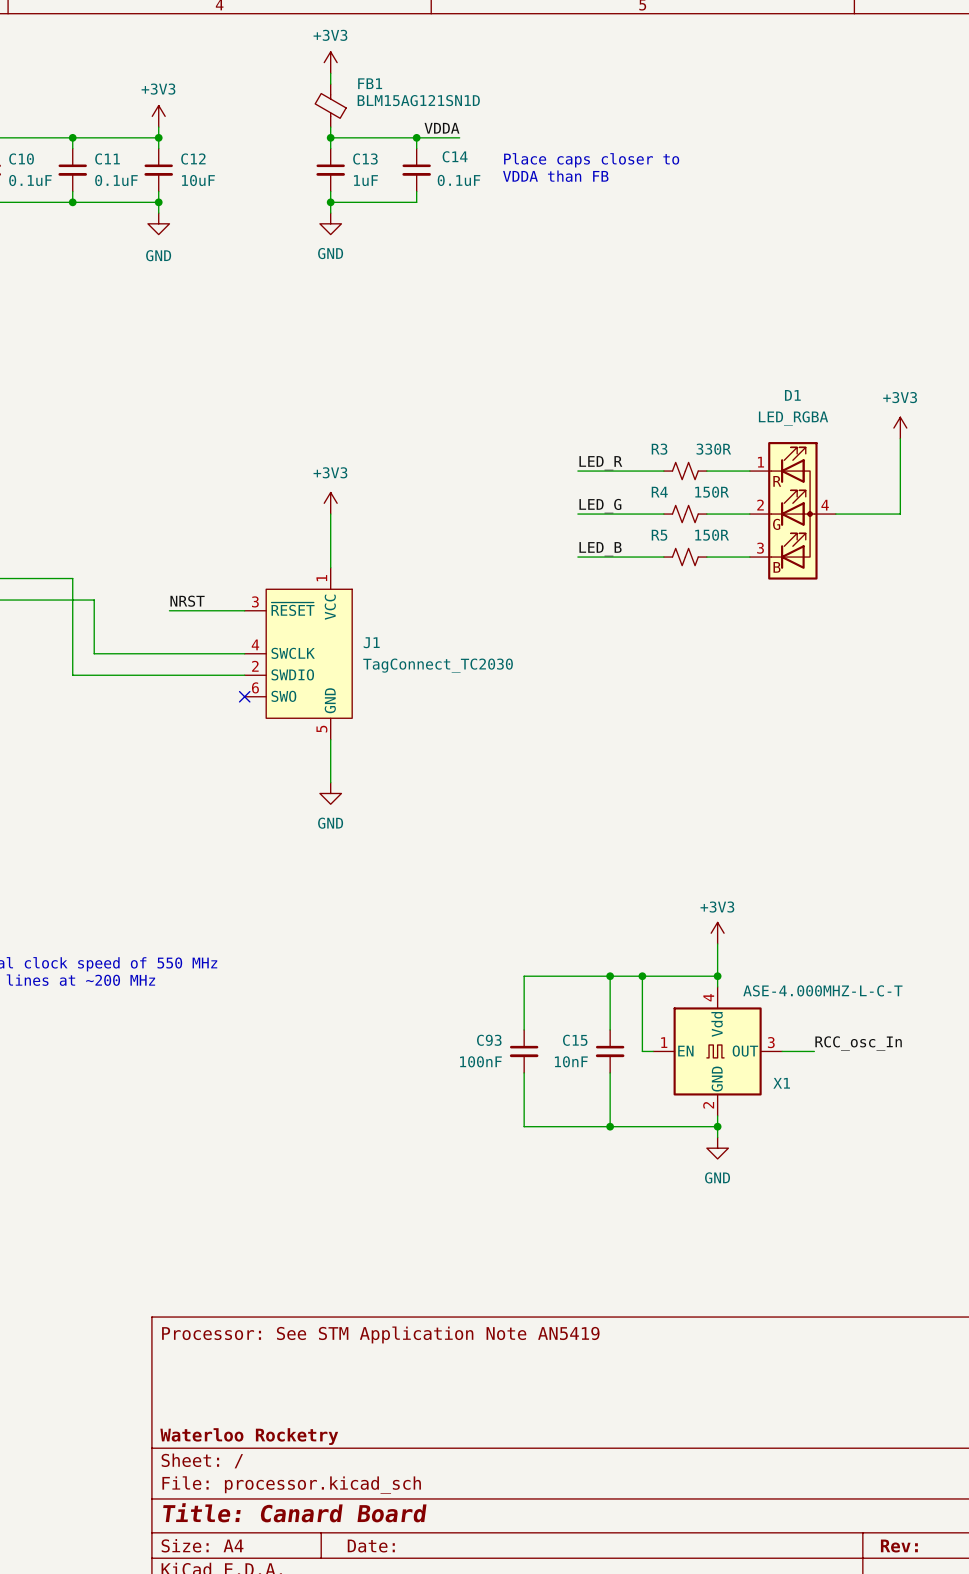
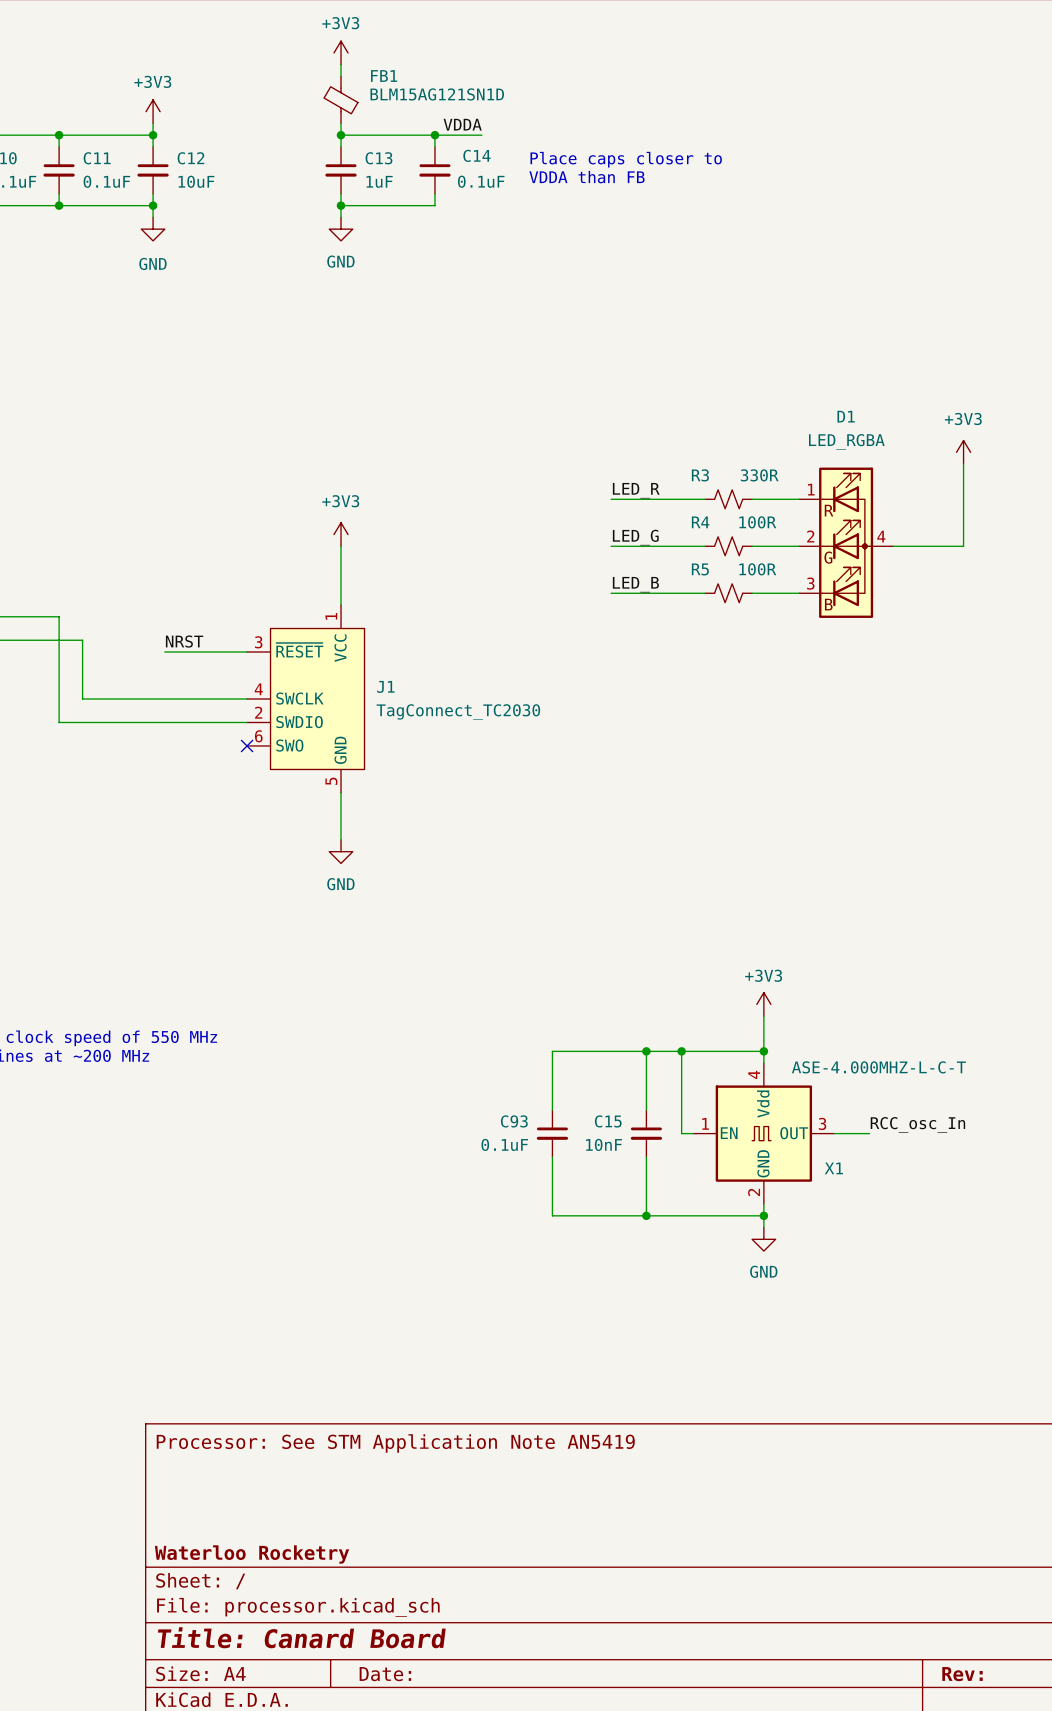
R4 value: 150R (712, 492) -> 100R (757, 522)
R5 value: 150R (712, 535) -> 100R (757, 569)
C93 value: 100nF (480, 1061) -> 0.1uF (504, 1144)

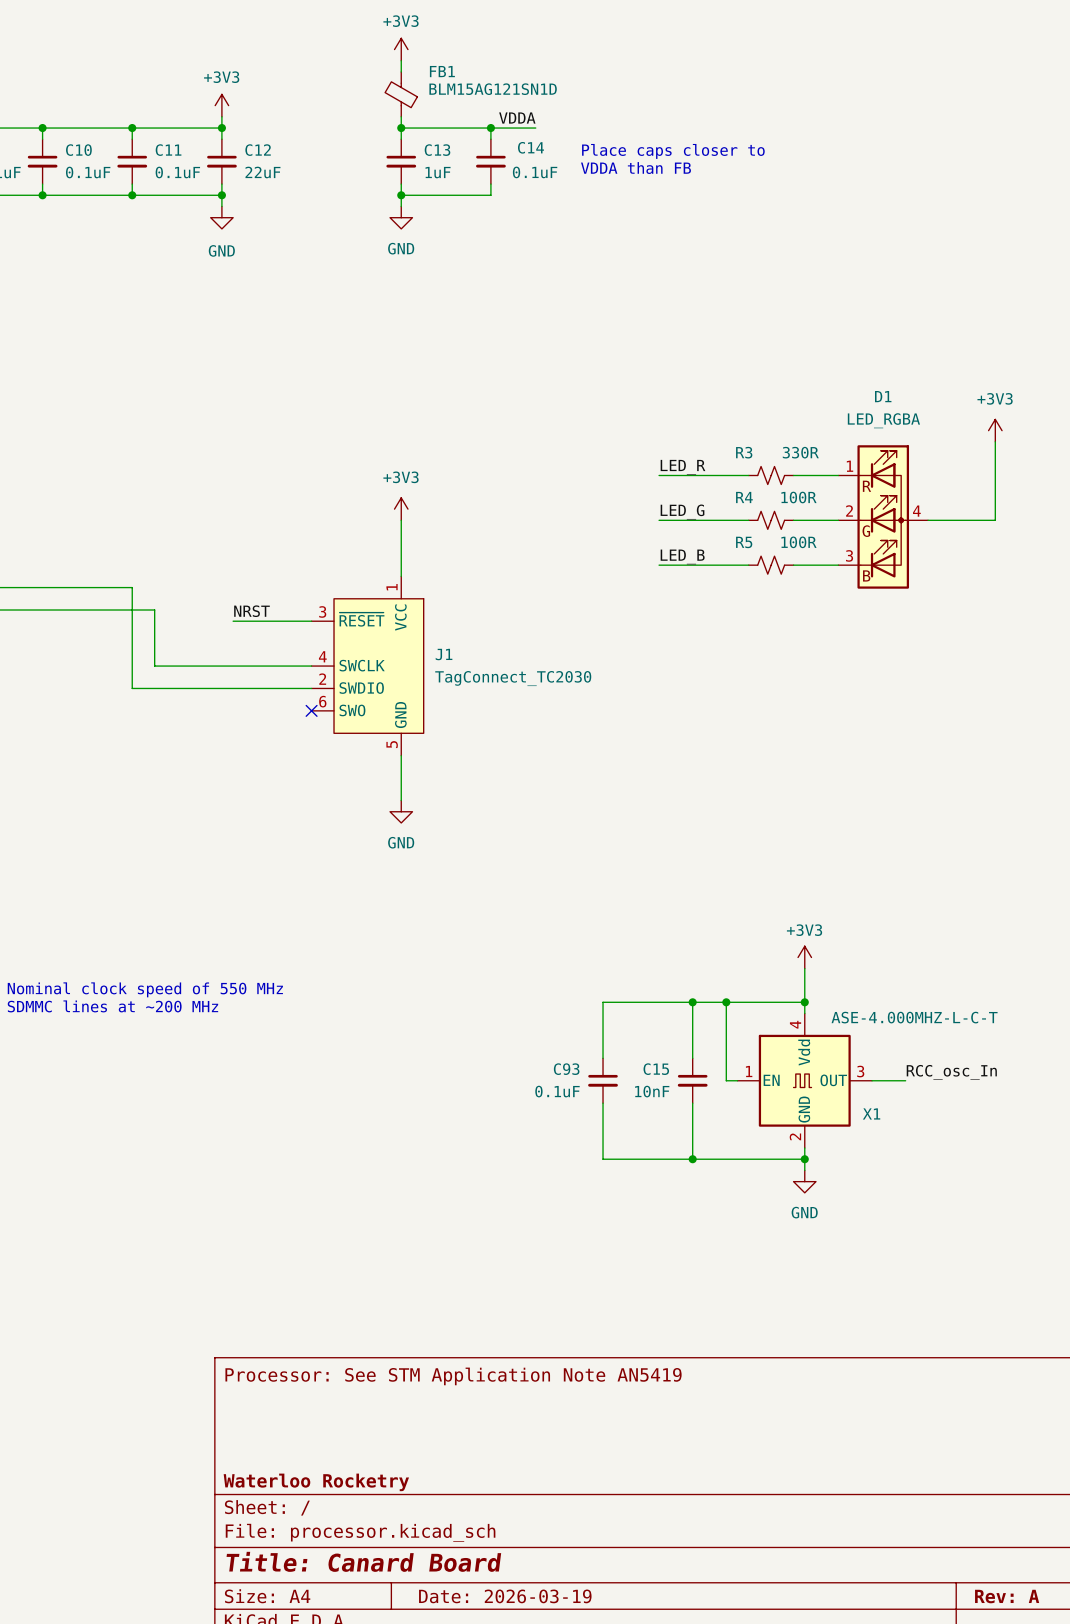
C12 value: 10uF (196, 181) -> 22uF (262, 172)
title block: Date: (385, 1674) -> Date: 2026-03-19 (505, 1596)
title block: Rev: (962, 1674) -> Rev: A (1007, 1596)

